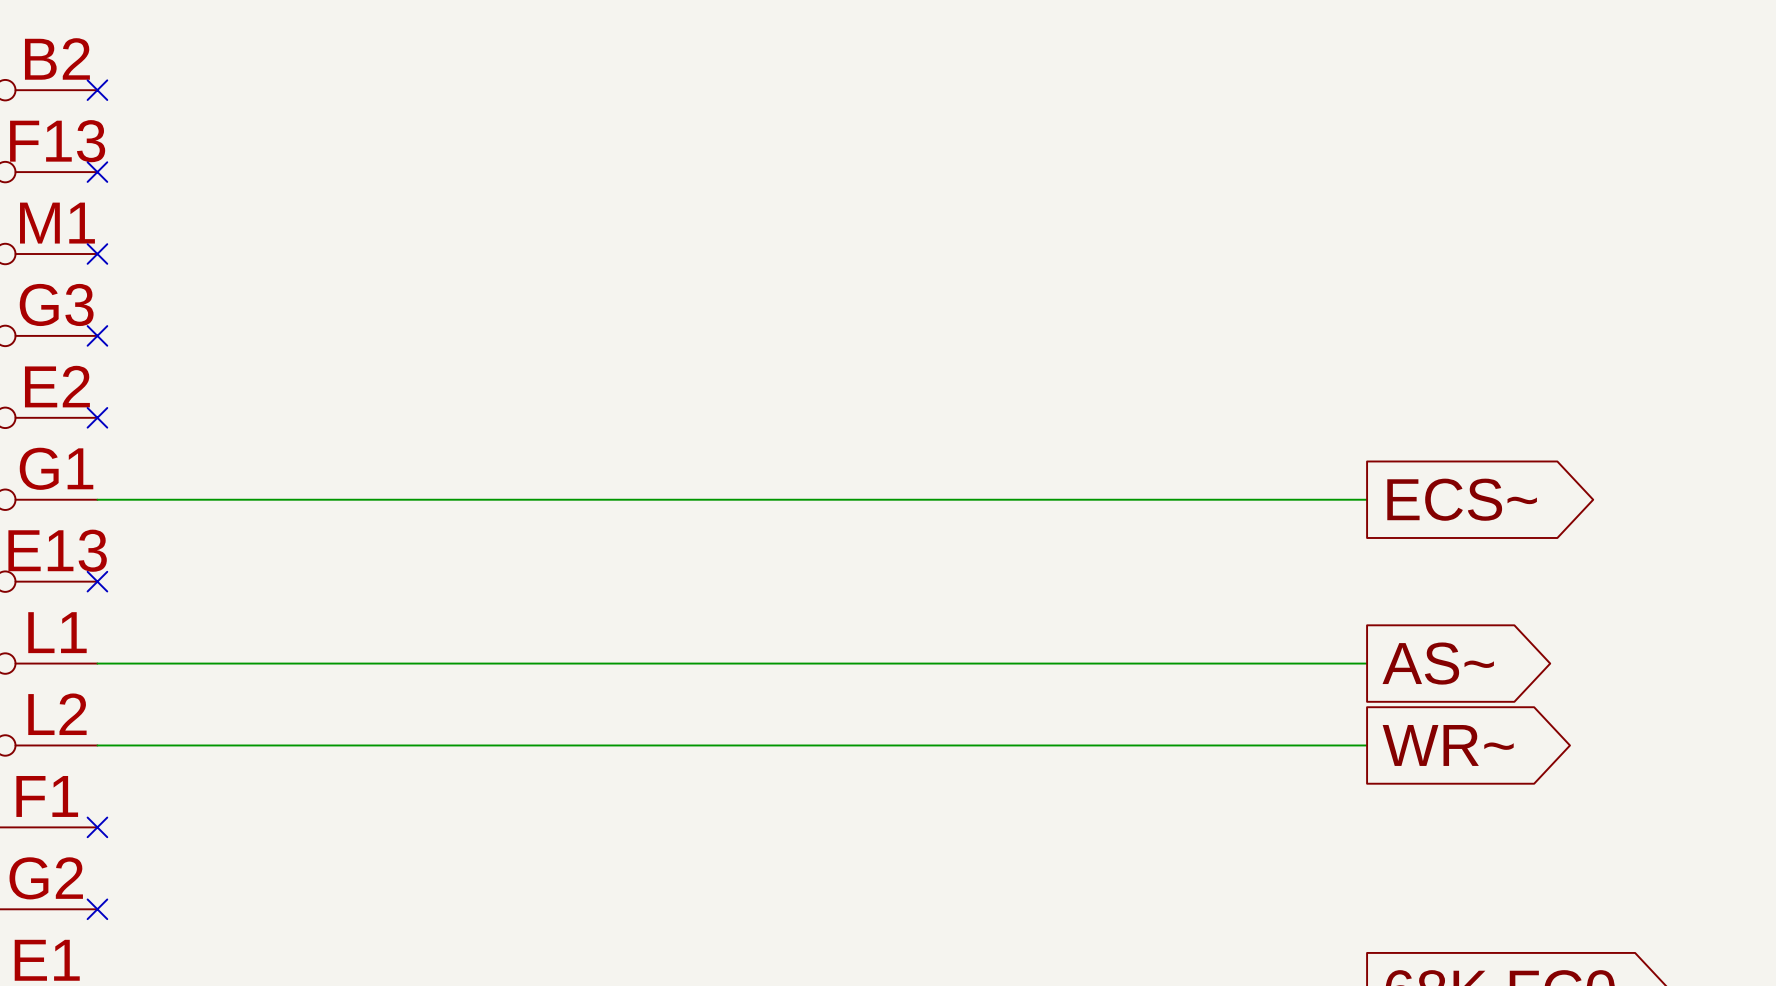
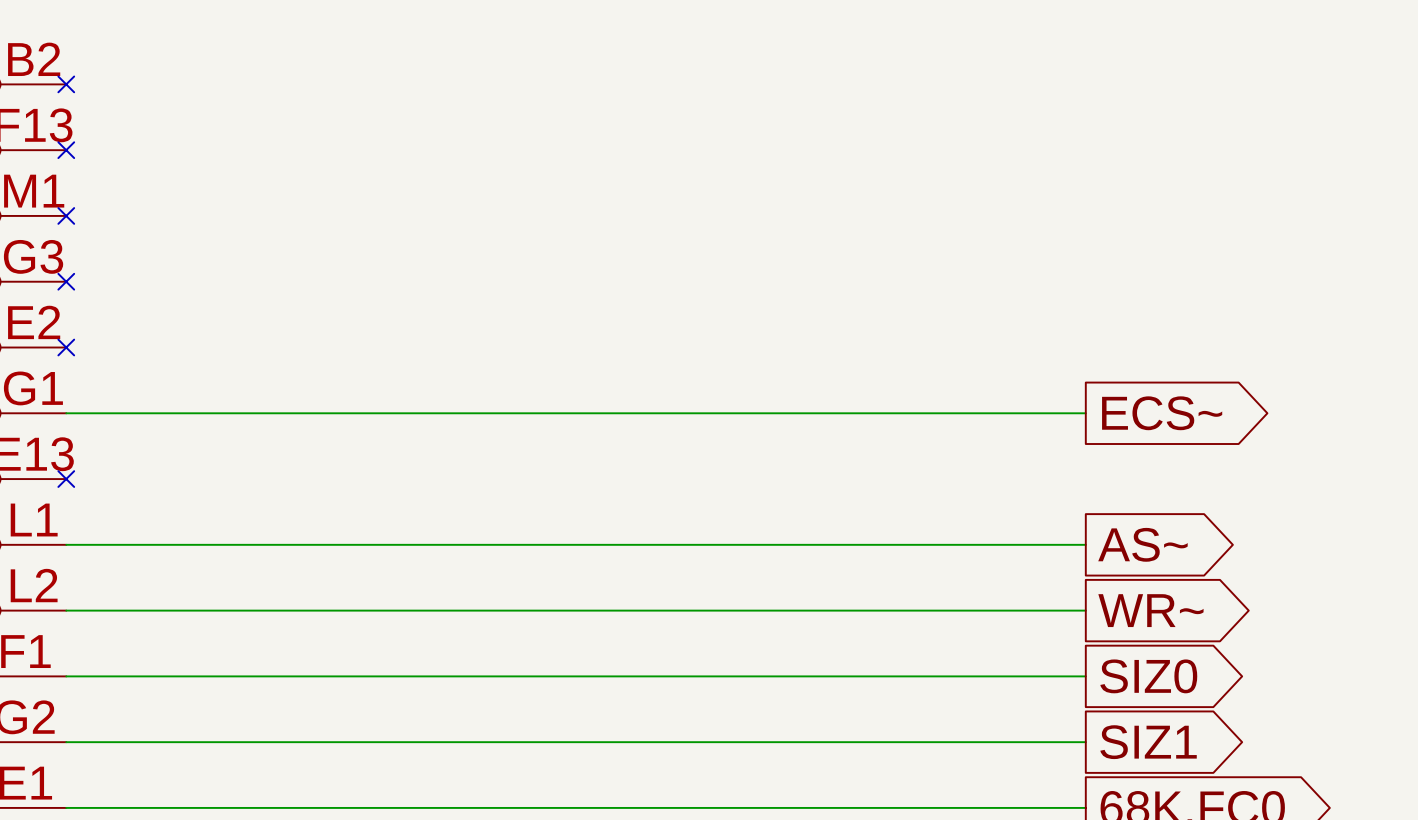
wire: none -> (66, 676) (1085, 676)
no-connect mark: (97, 827) -> none
global label: none -> SIZ0 (1148, 676)
wire: none -> (66, 742) (1085, 742)
no-connect mark: (97, 909) -> none
global label: none -> SIZ1 (1148, 742)

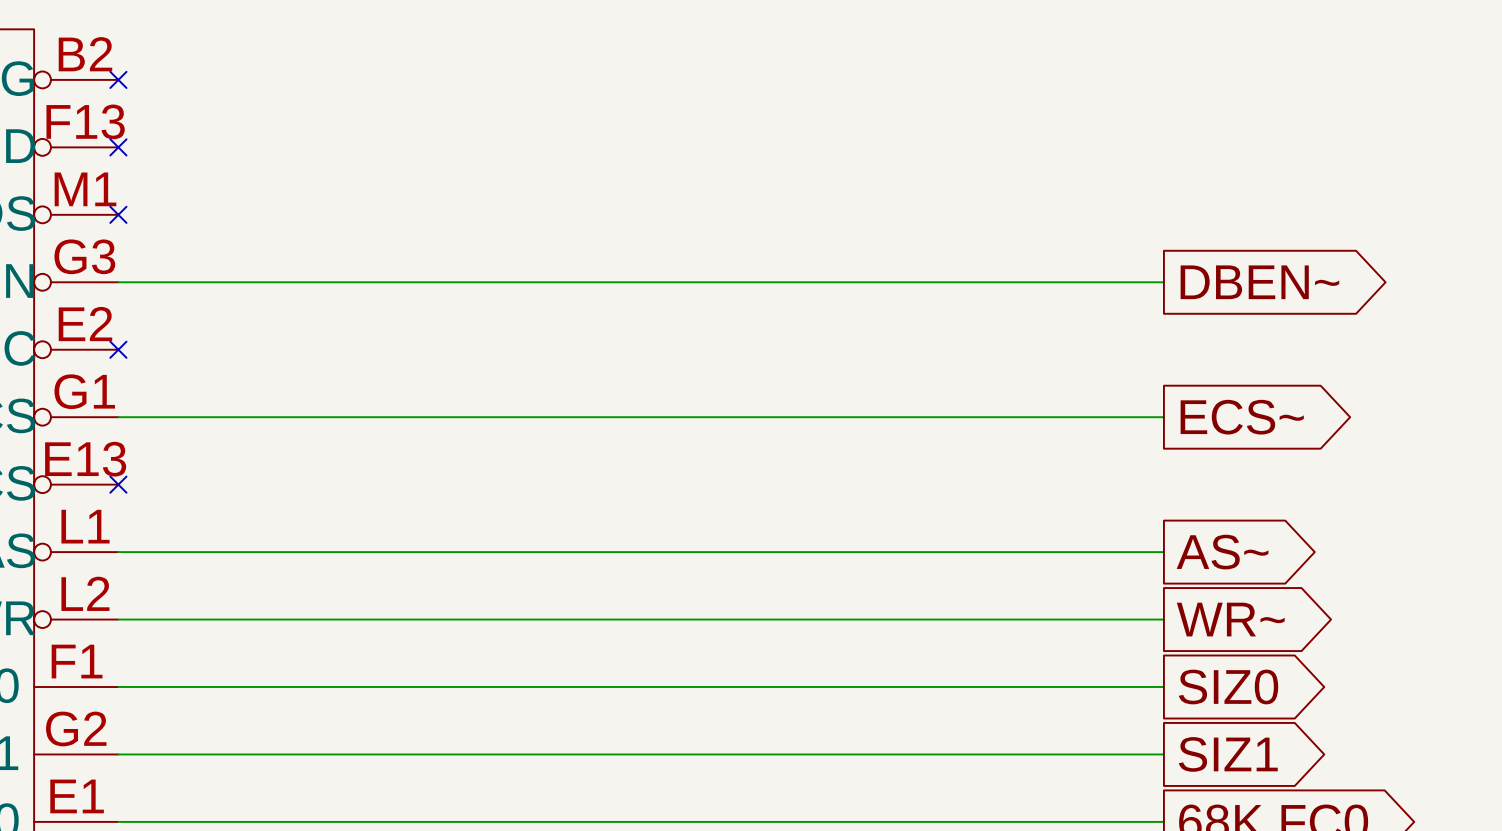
wire: none -> (118, 282) (1163, 282)
no-connect mark: (66, 281) -> none
global label: none -> DBEN~ (1259, 282)

